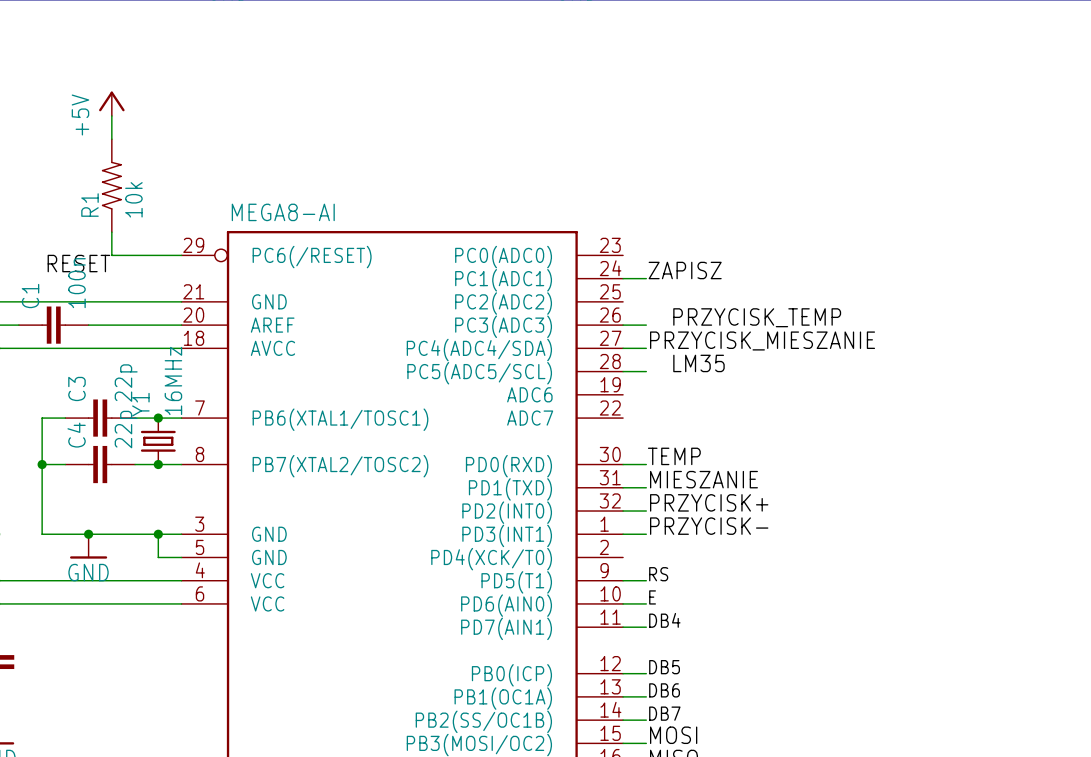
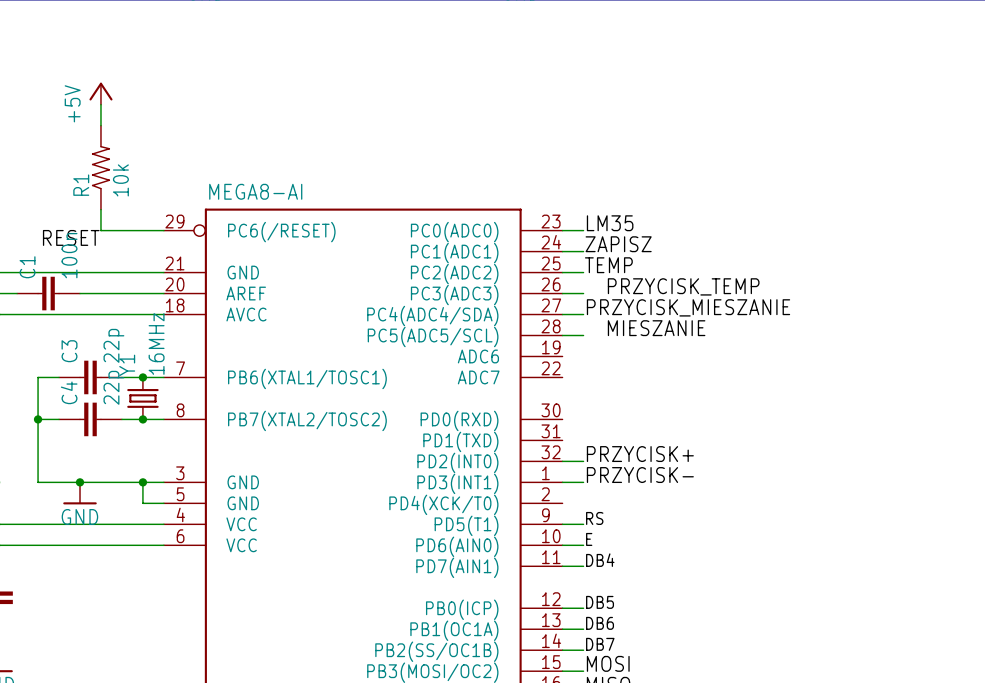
label: none -> LM35 (610, 223)
wire: none -> (562, 230) (583, 230)
label: LM35 (698, 363) -> MIESZANIE (656, 328)
label position: TEMP (674, 456) -> TEMP (608, 265)
wire: (623, 464) (646, 464) -> (562, 272) (583, 272)
label: MIESZANIE (703, 479) -> none
wire: (623, 487) (646, 487) -> none

